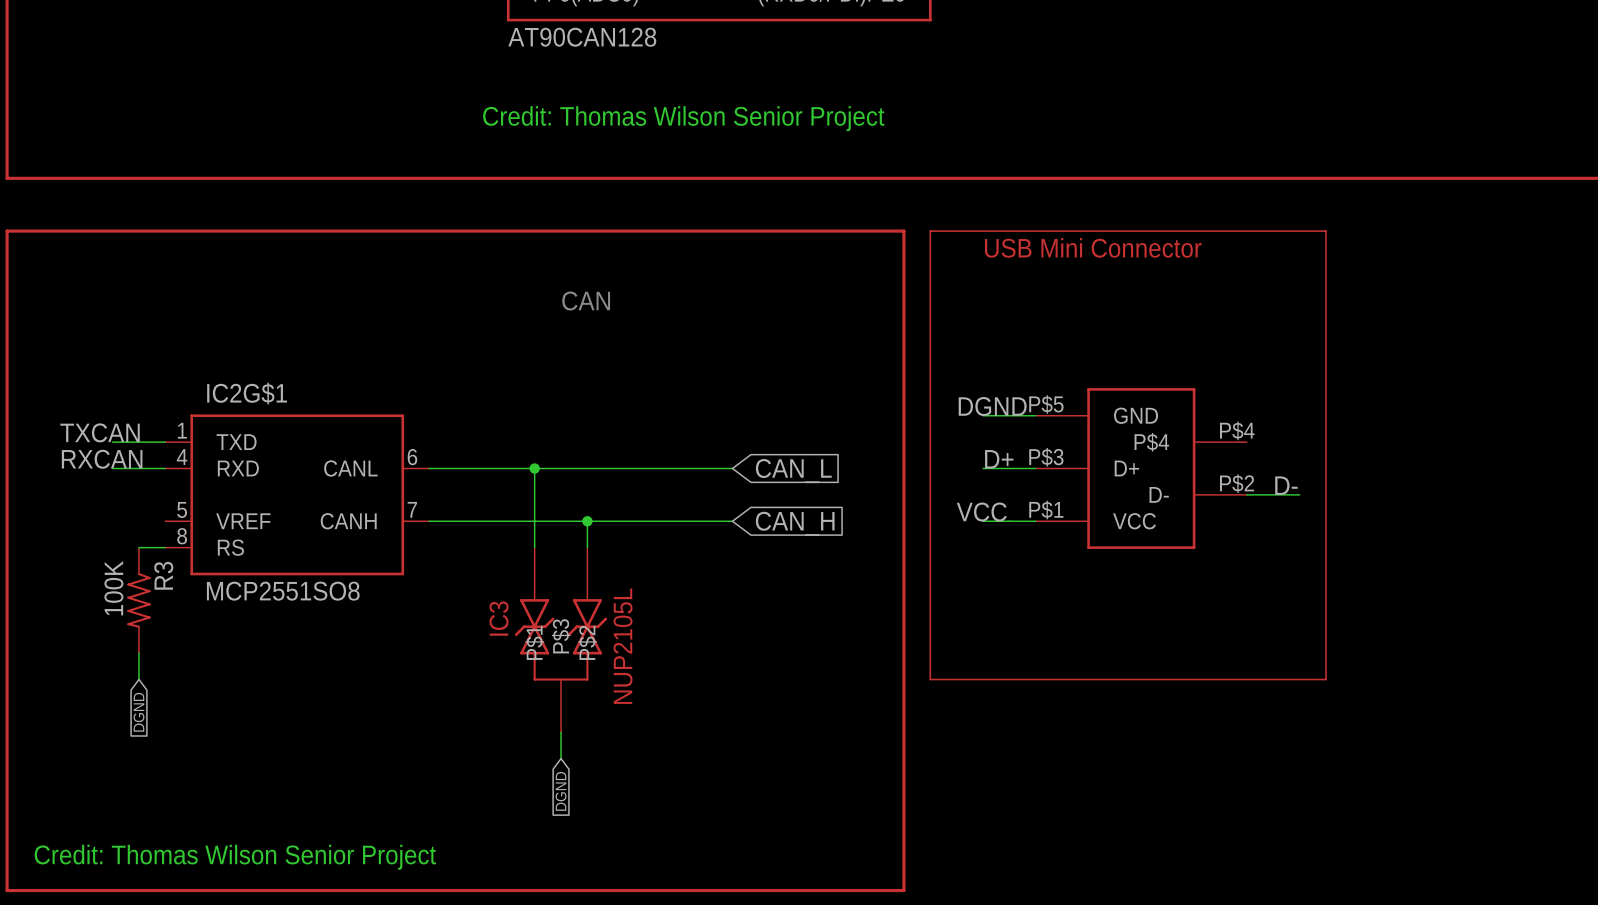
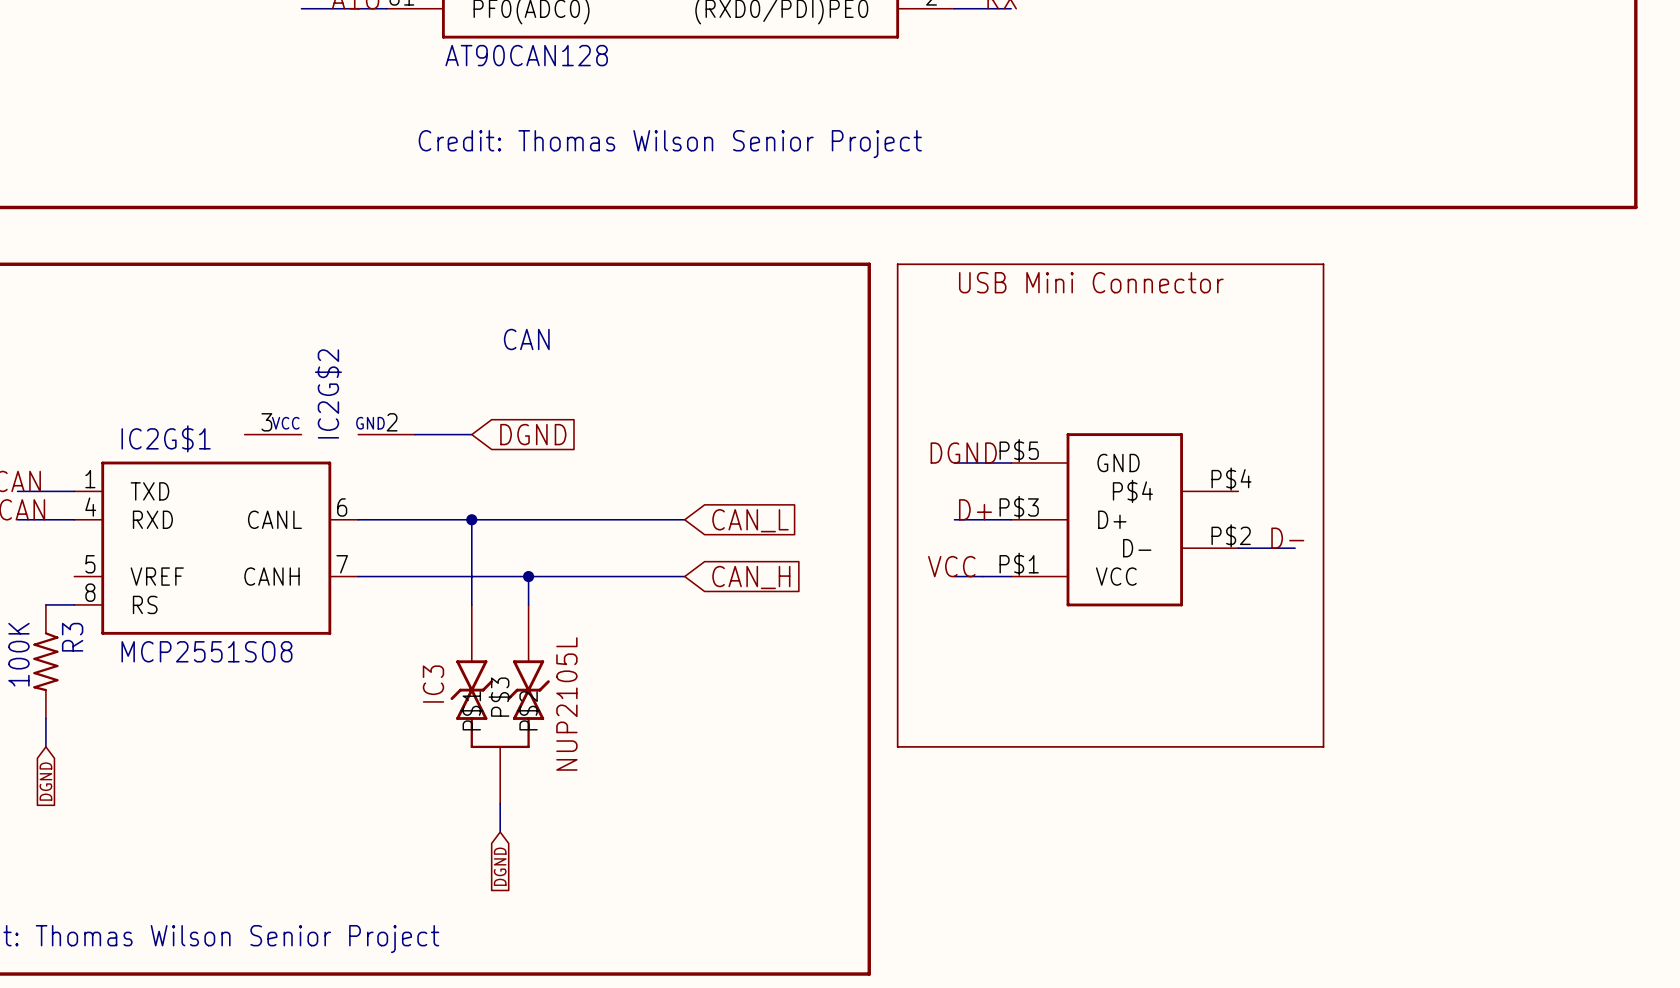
IC2G$2: none -> (329, 434)
wire: none -> (415, 434) (471, 434)
global label: none -> DGND (533, 434)

